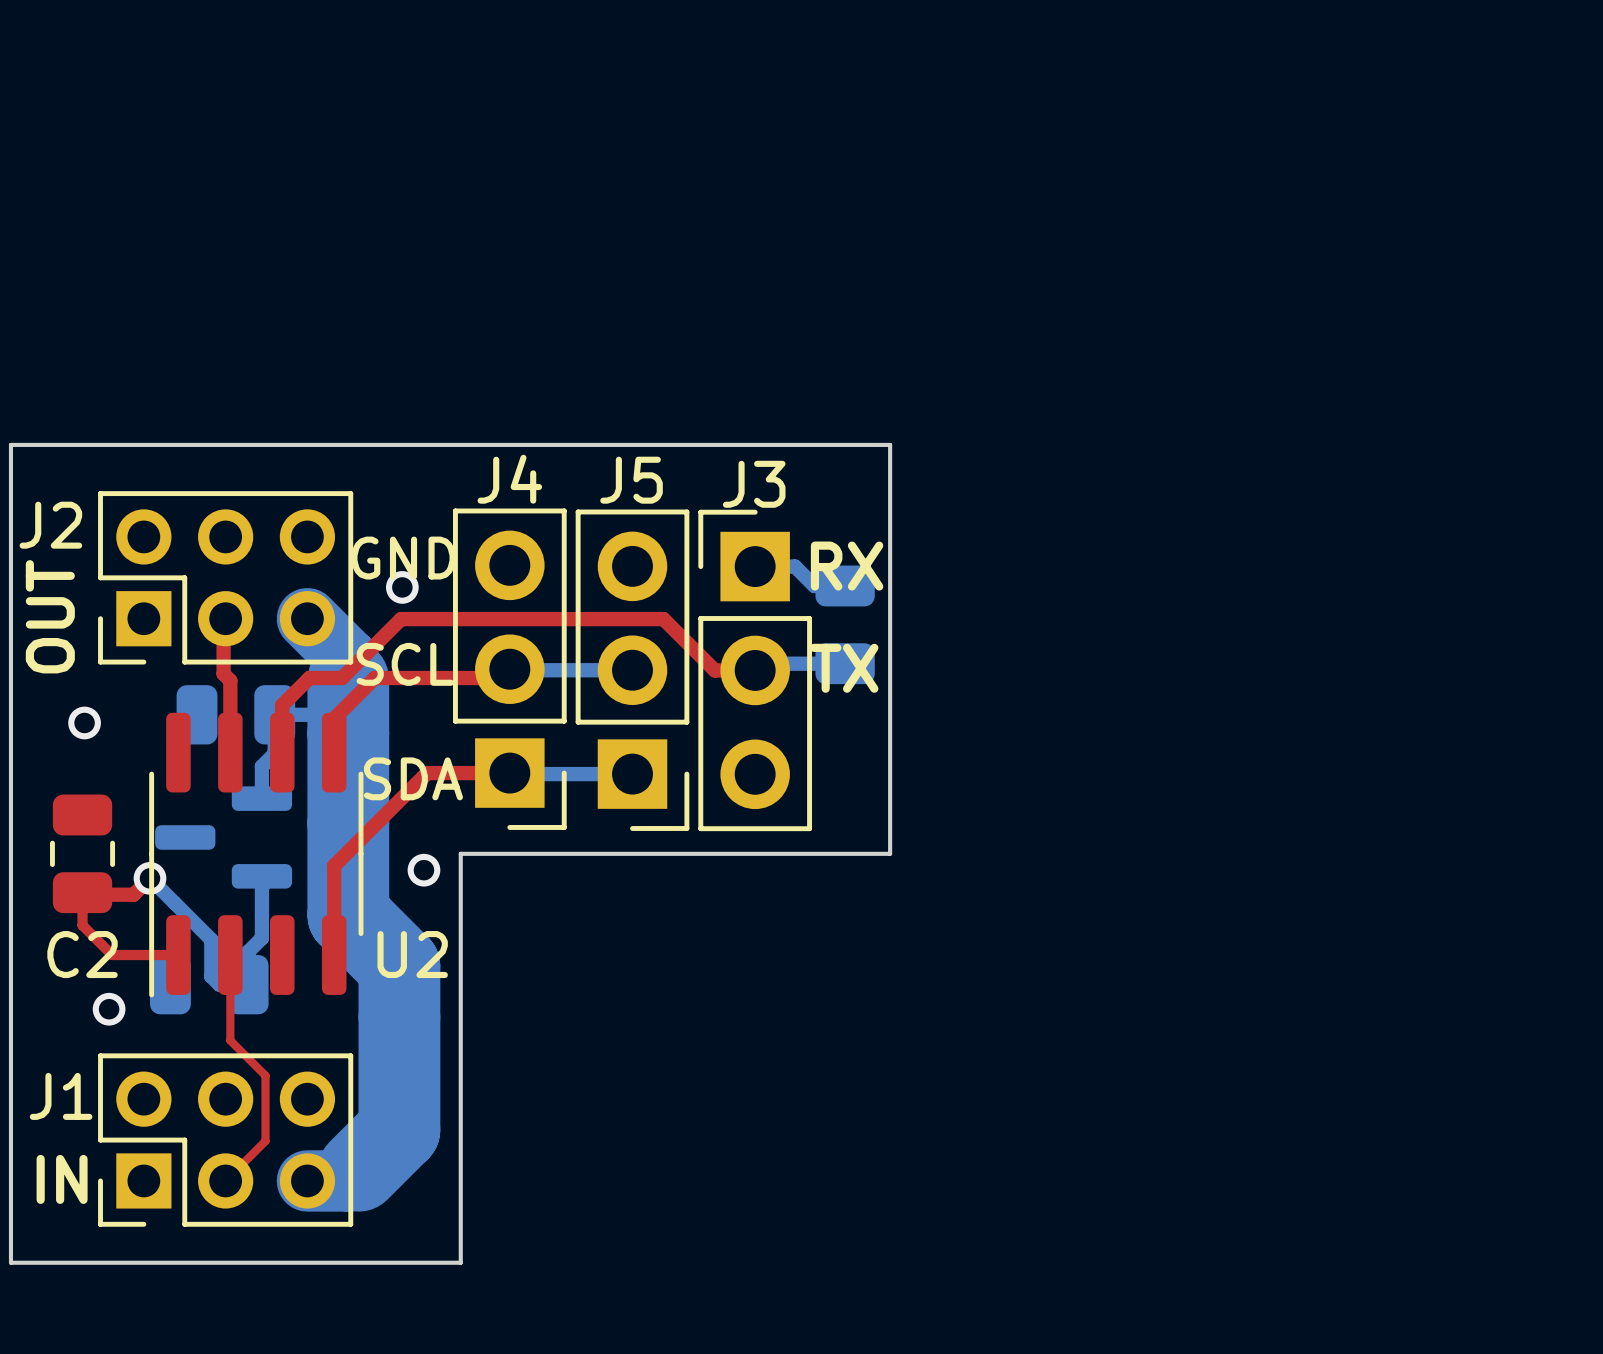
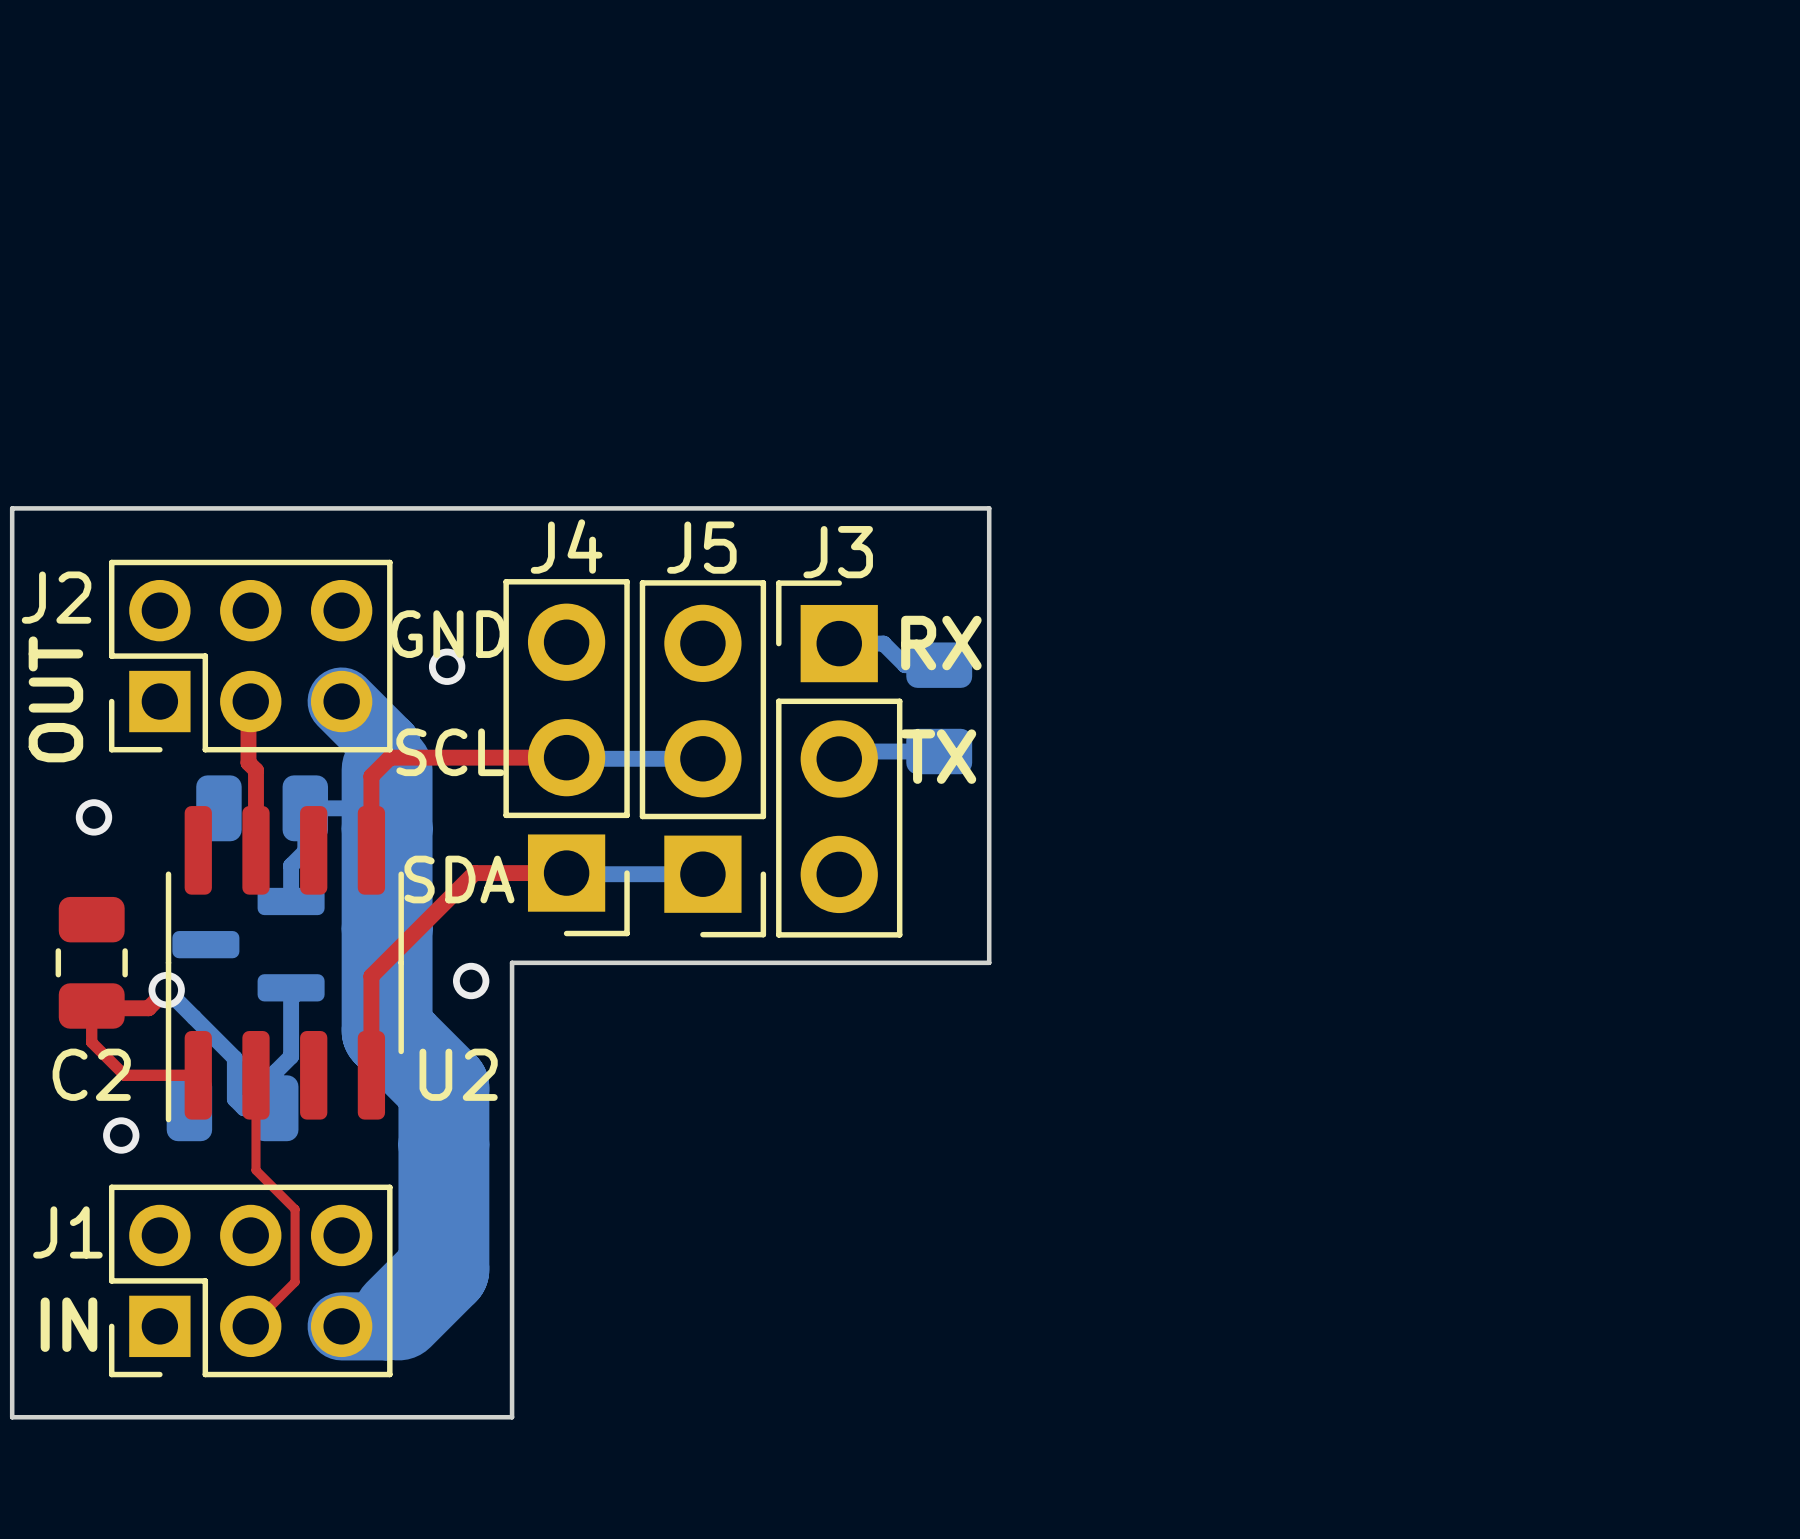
top track: (350, 669) (401, 619) (663, 619) (714, 670) (755, 670) -> none
top track: (509, 669) (501, 678) (374, 678) (334, 718) -> (566, 757) (390, 757)
top track: (342, 678) (309, 678) (282, 705) (282, 752) -> (380, 767) (371, 776) (371, 812)

